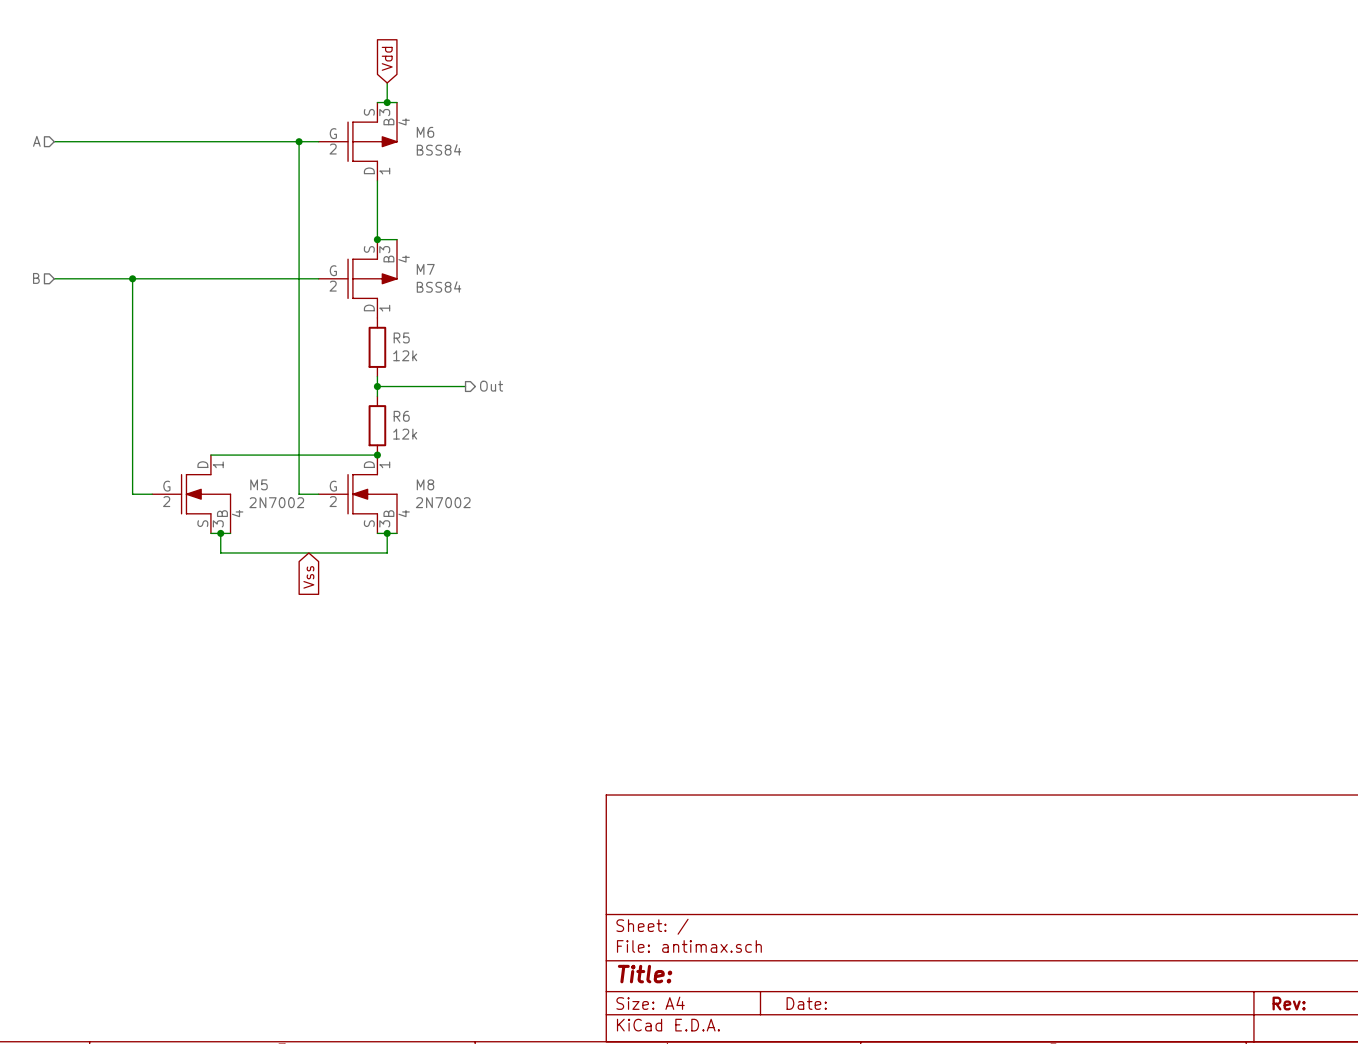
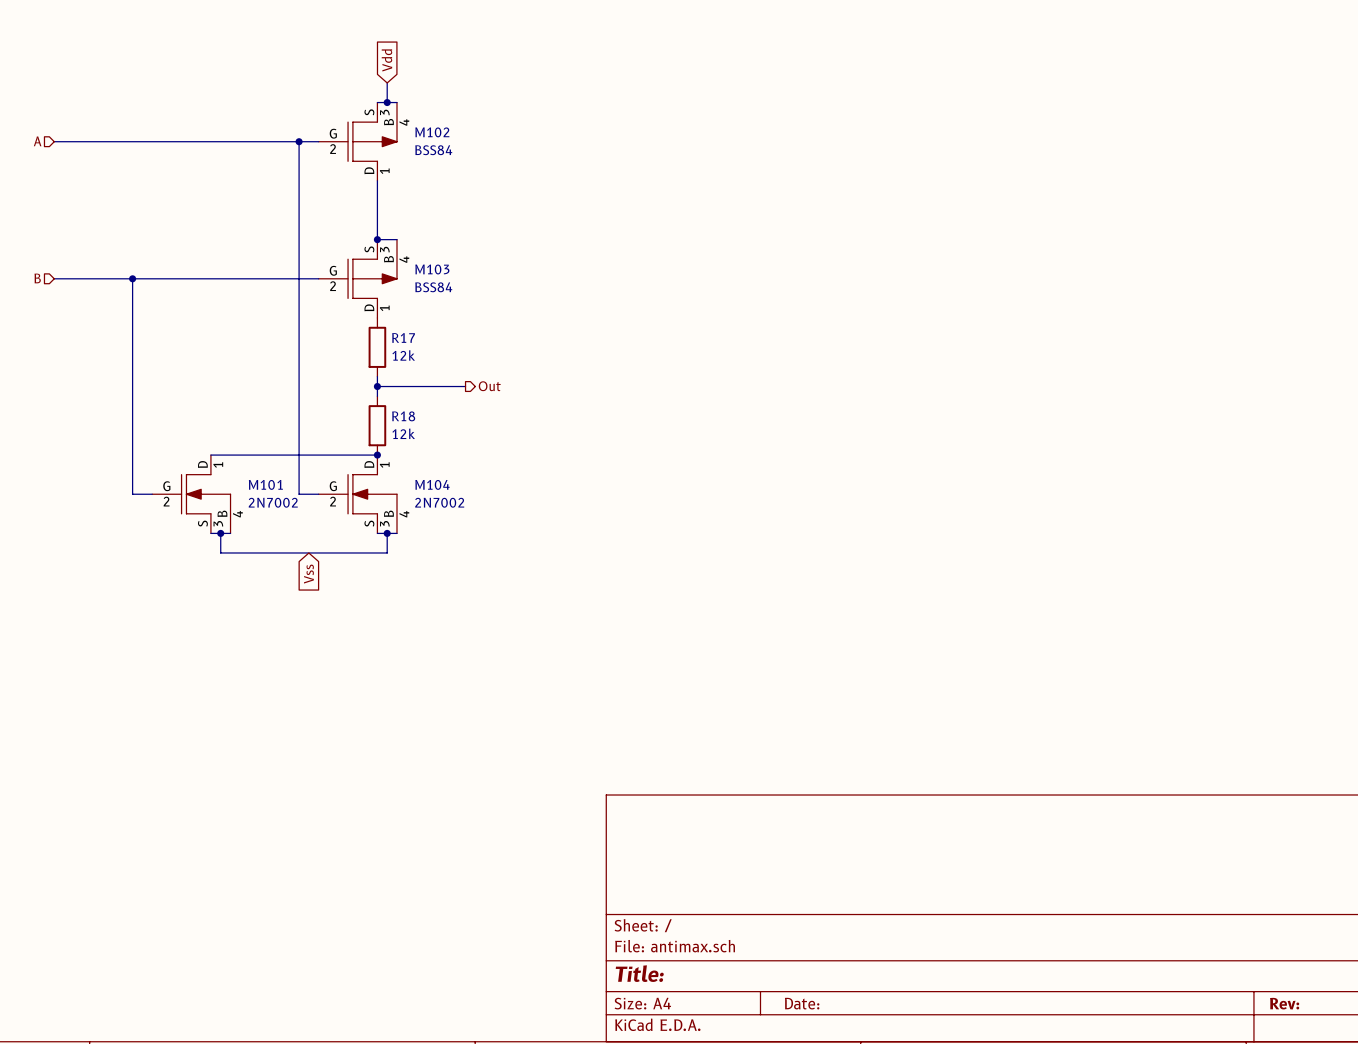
M6 name: M6 (425, 132) -> M102 (432, 132)
M7 name: M7 (425, 269) -> M103 (432, 269)
R5 name: R5 (401, 337) -> R17 (403, 337)
R6 name: R6 (401, 416) -> R18 (403, 416)
M5 name: M5 (259, 484) -> M101 (265, 484)
M8 name: M8 (425, 484) -> M104 (432, 484)

